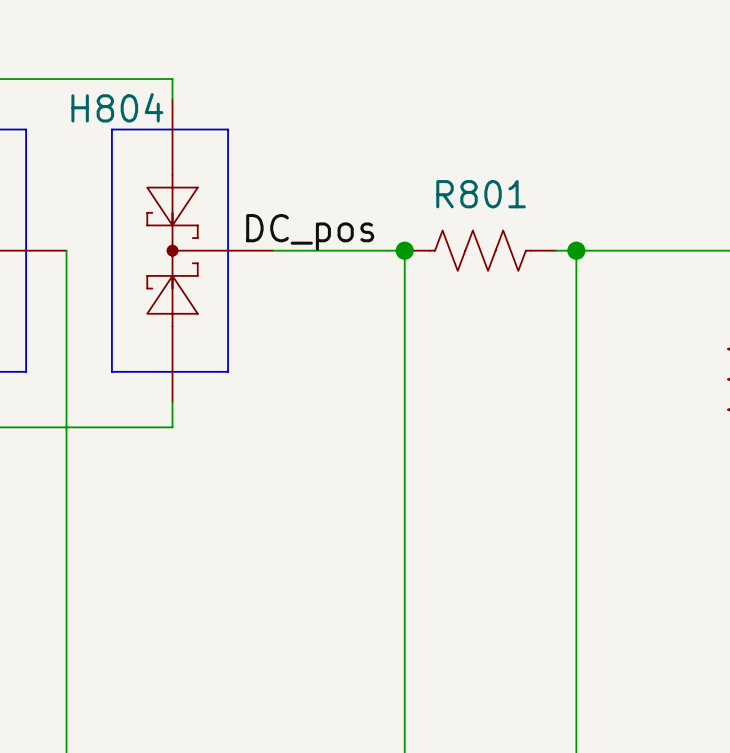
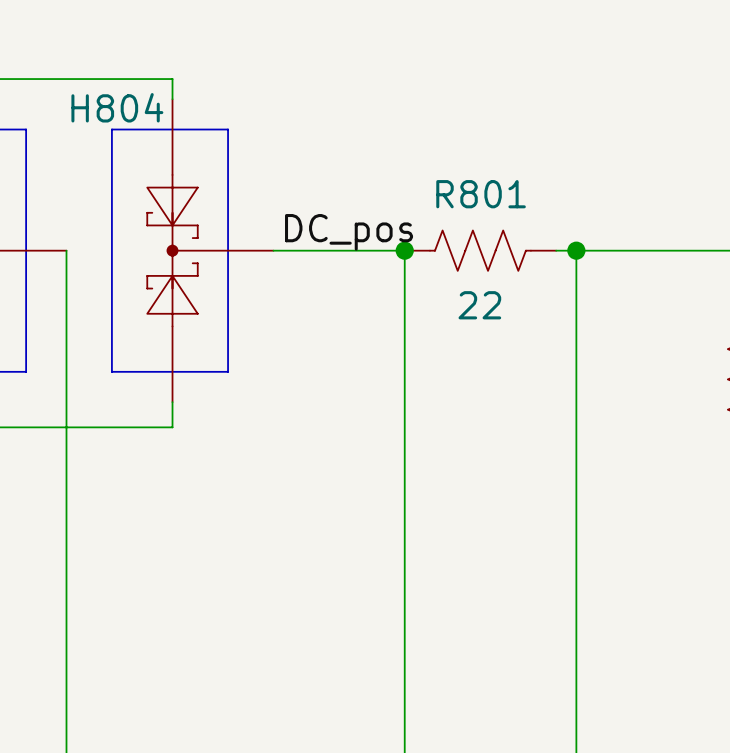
label position: DC_pos (310, 232) -> DC_pos (349, 232)
R801 value: none -> 22 (479, 305)

